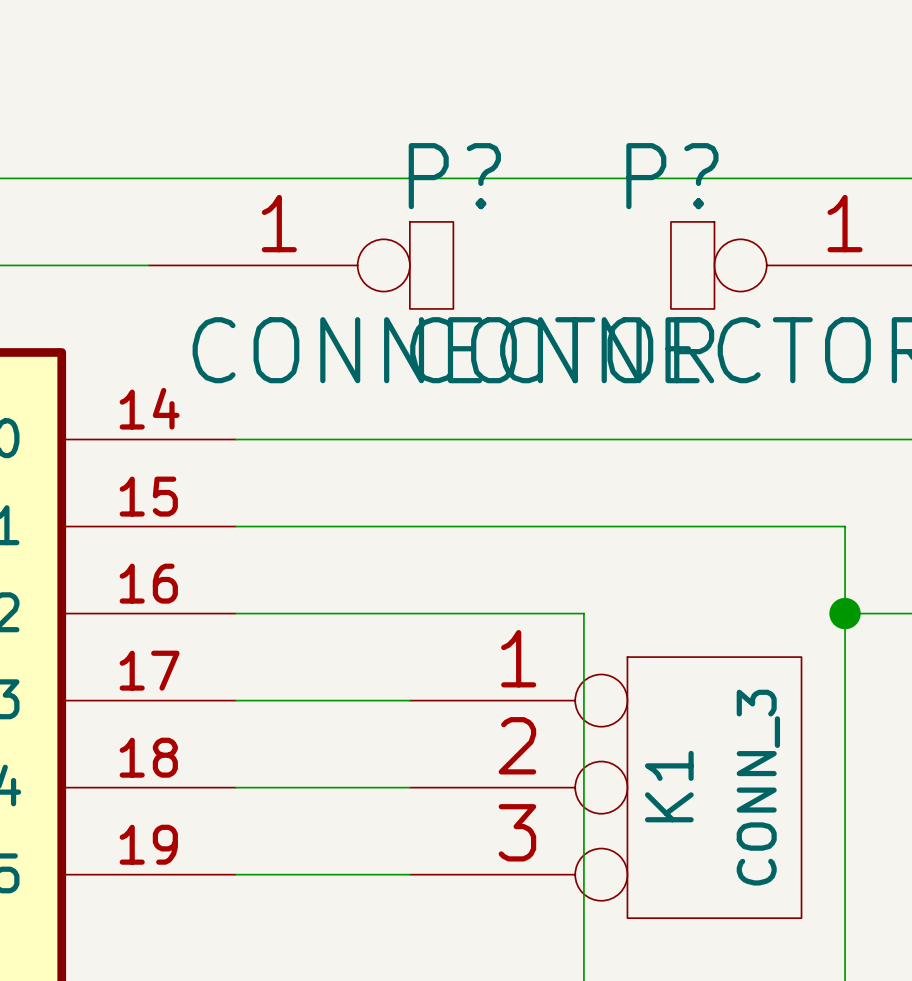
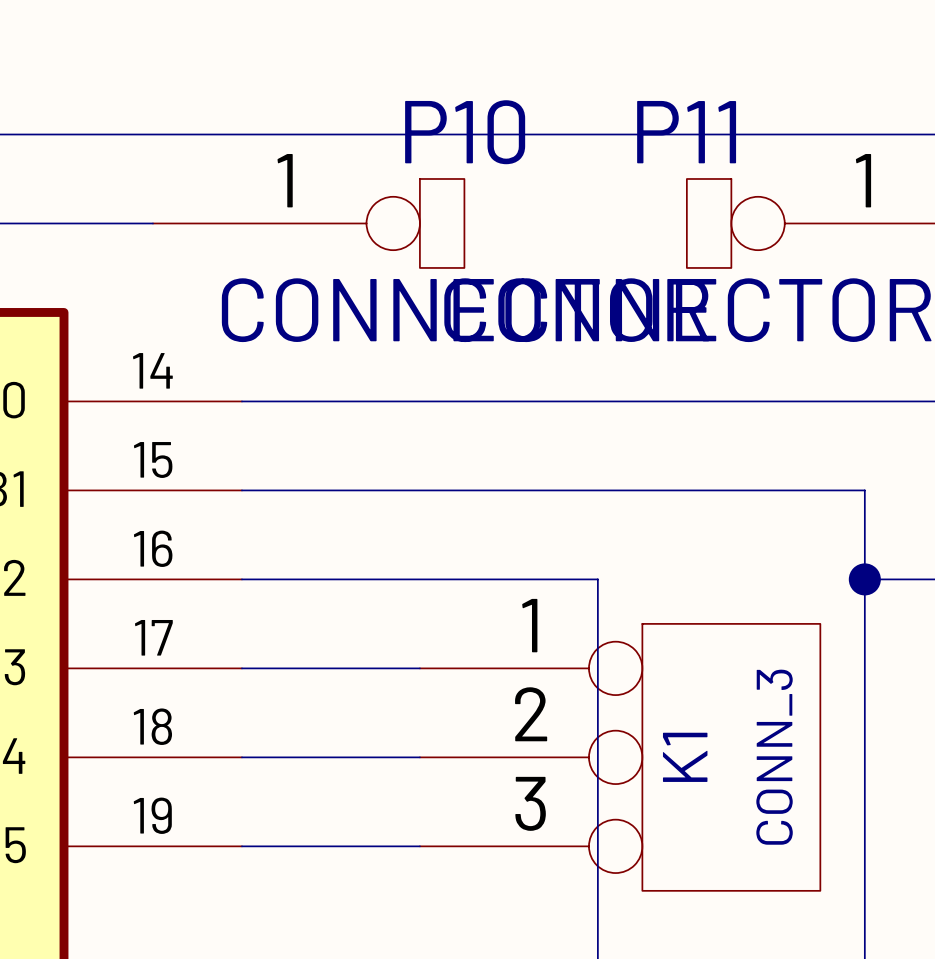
P? name: P? (454, 176) -> P10 (465, 132)
P? name: P? (672, 176) -> P11 (686, 132)

